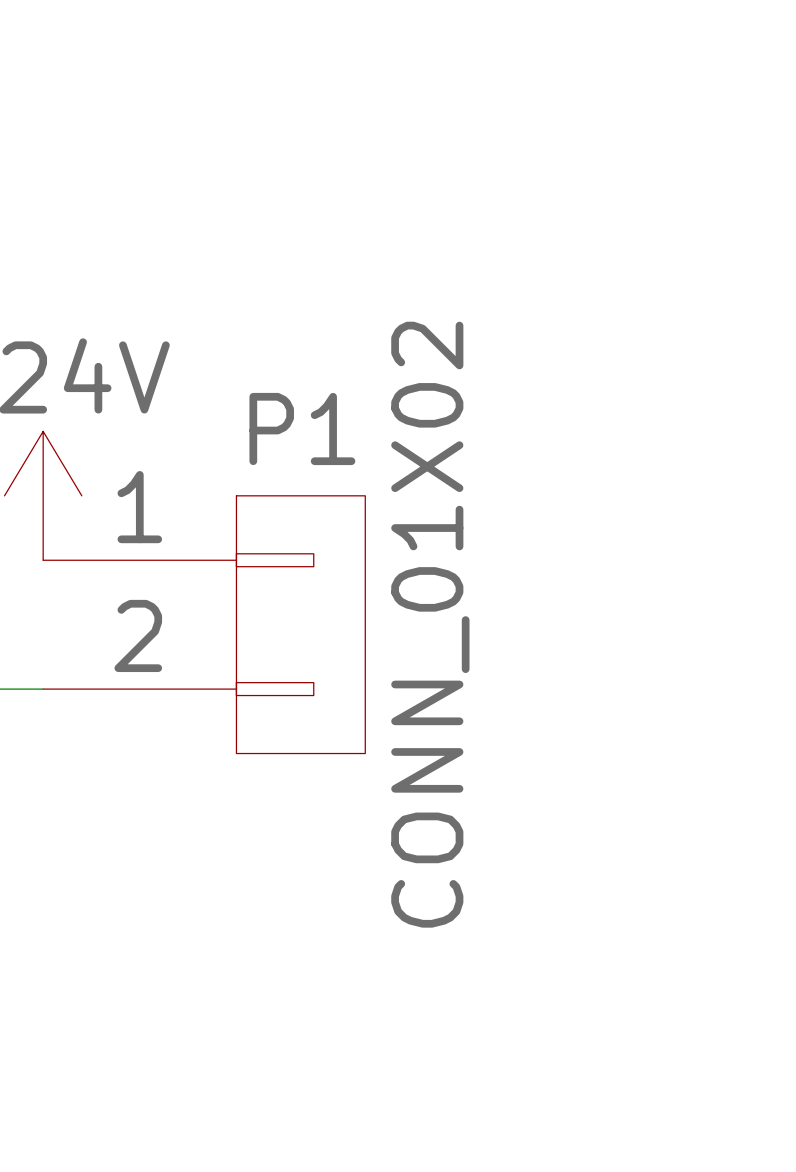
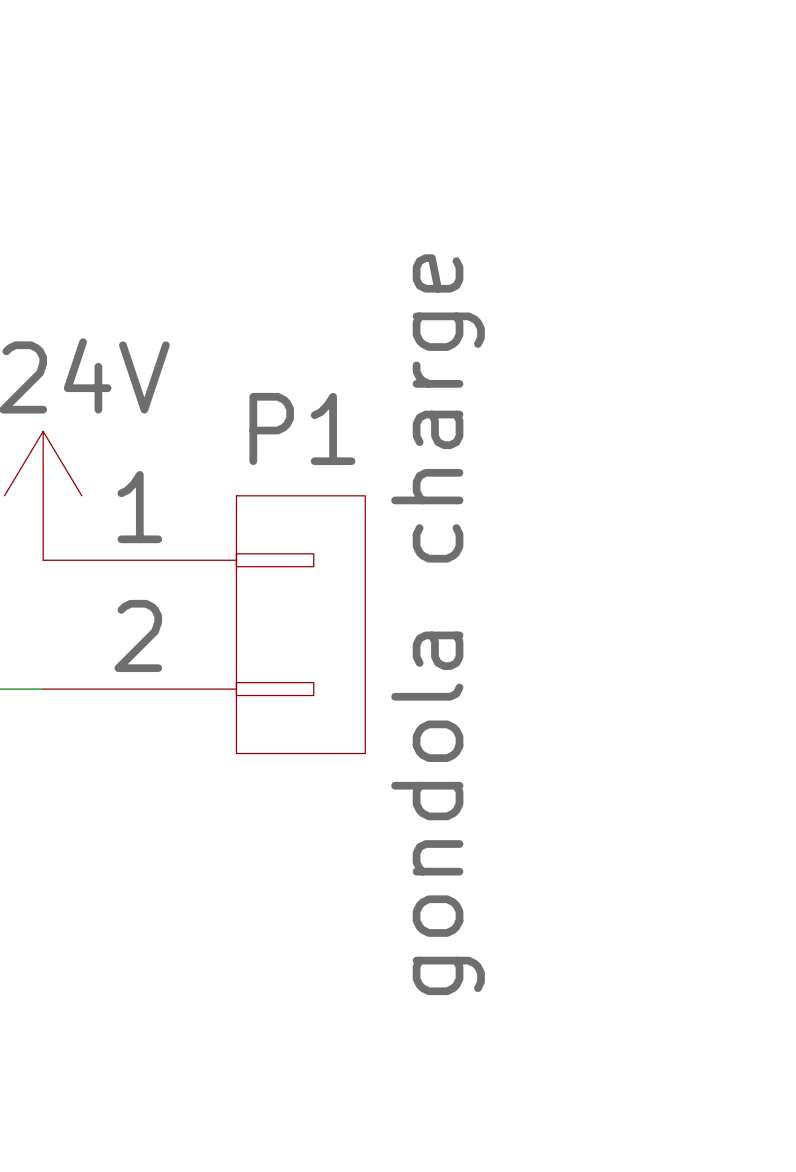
P1 value: CONN_01X02 (430, 624) -> gondola charge (438, 624)

